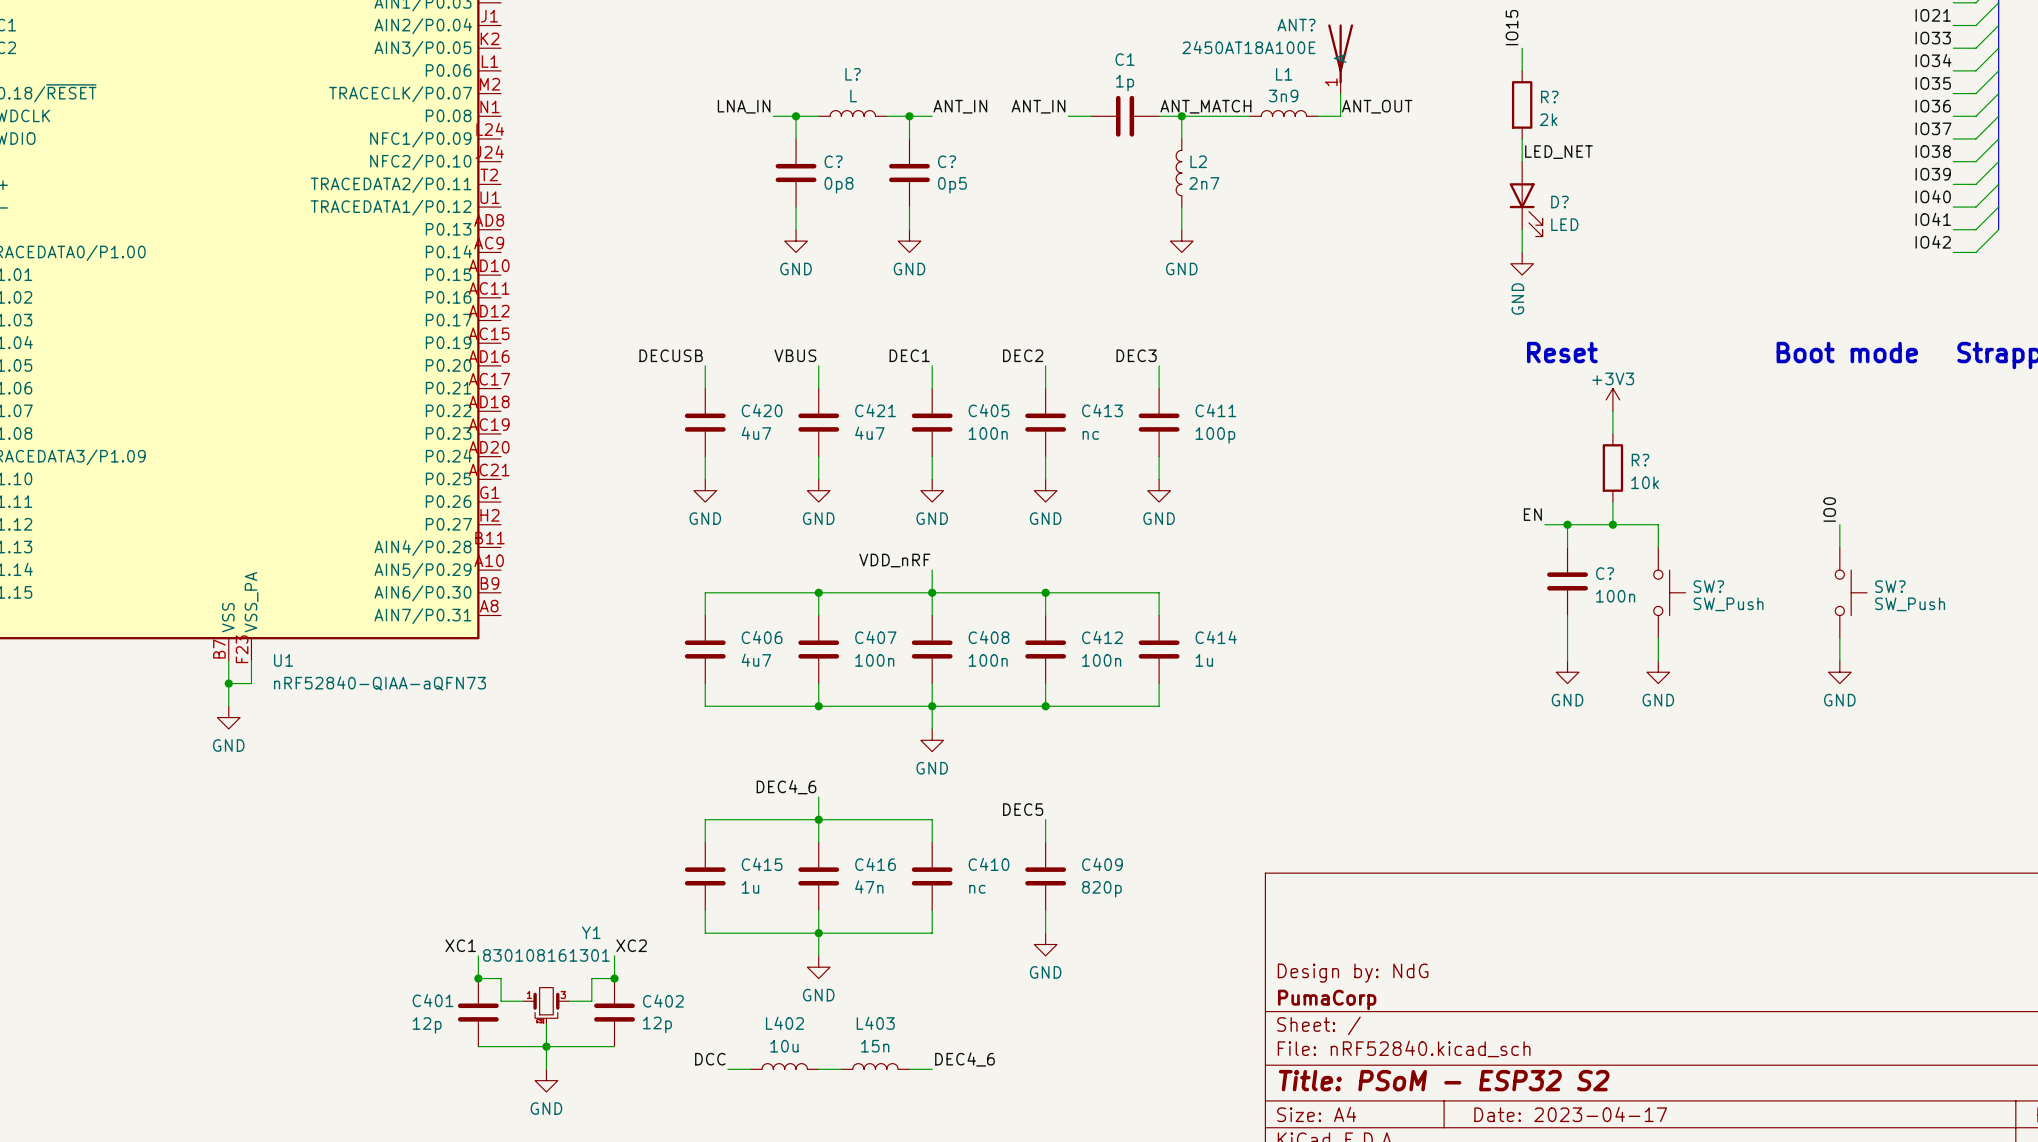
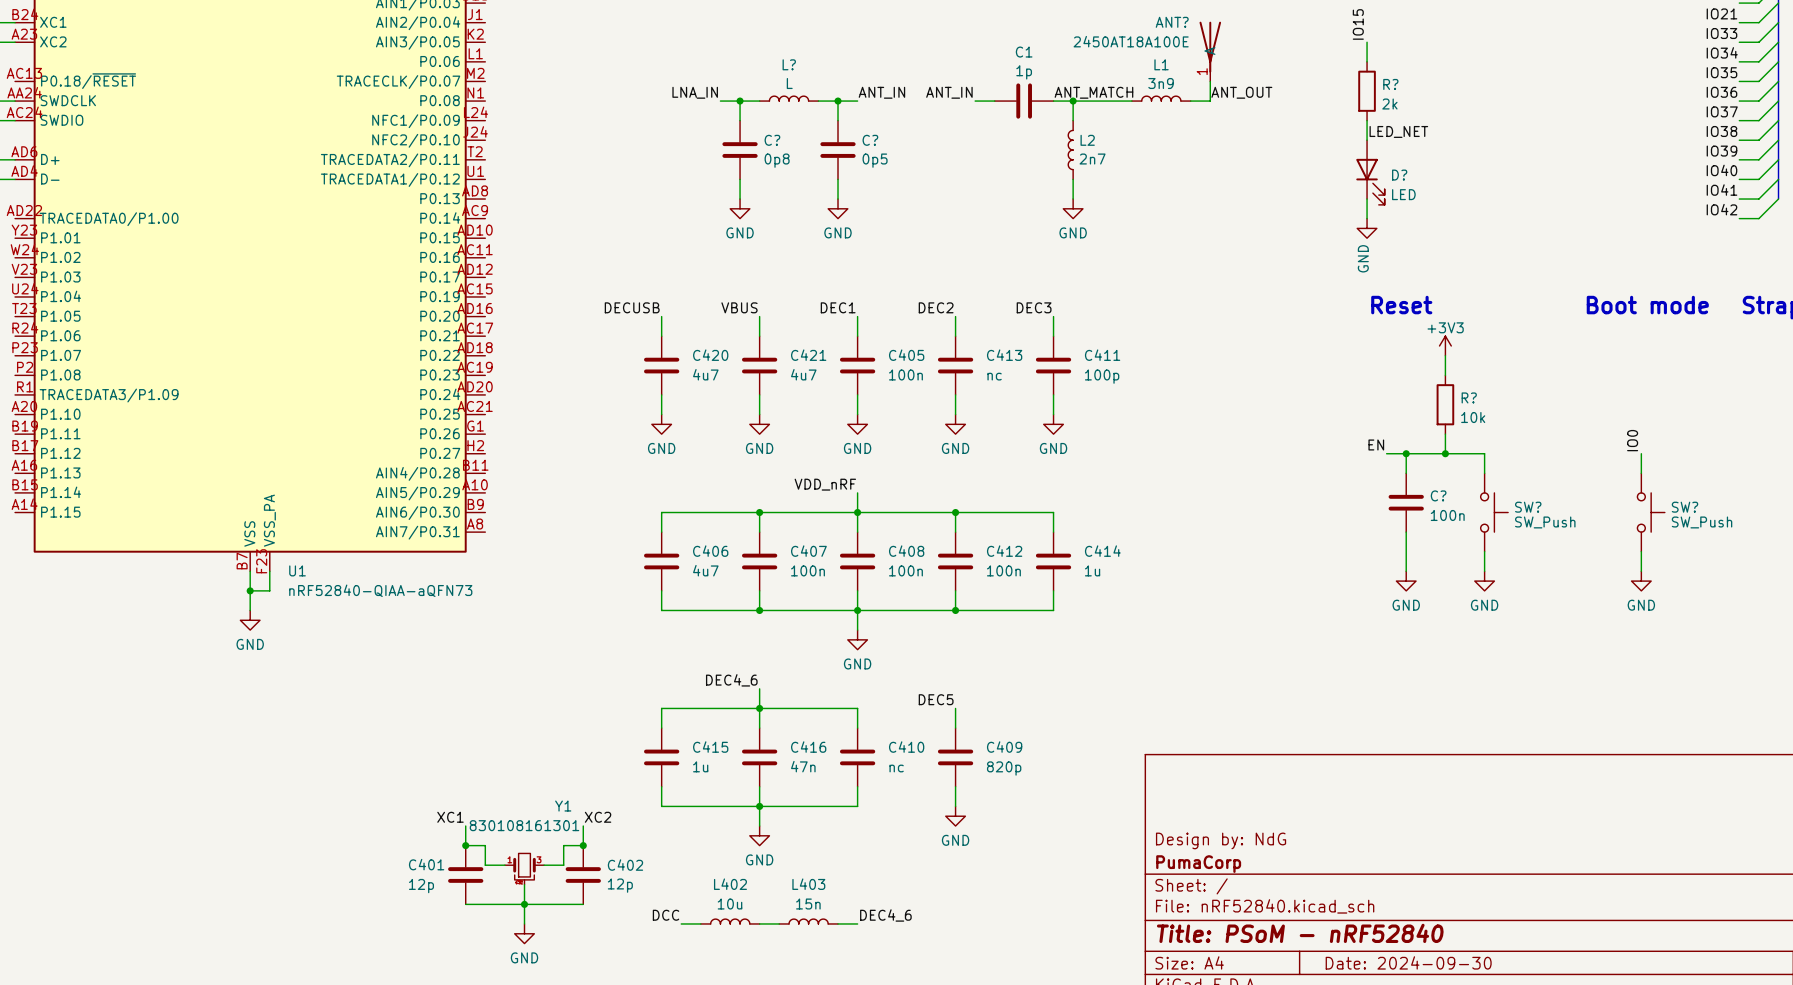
title block: Title: PSoM - ESP32 S2 (1444, 1080) -> Title: PSoM - nRF52840 (1300, 933)
title block: Date: 2023-04-17 (1570, 1114) -> Date: 2024-09-30 (1408, 962)

